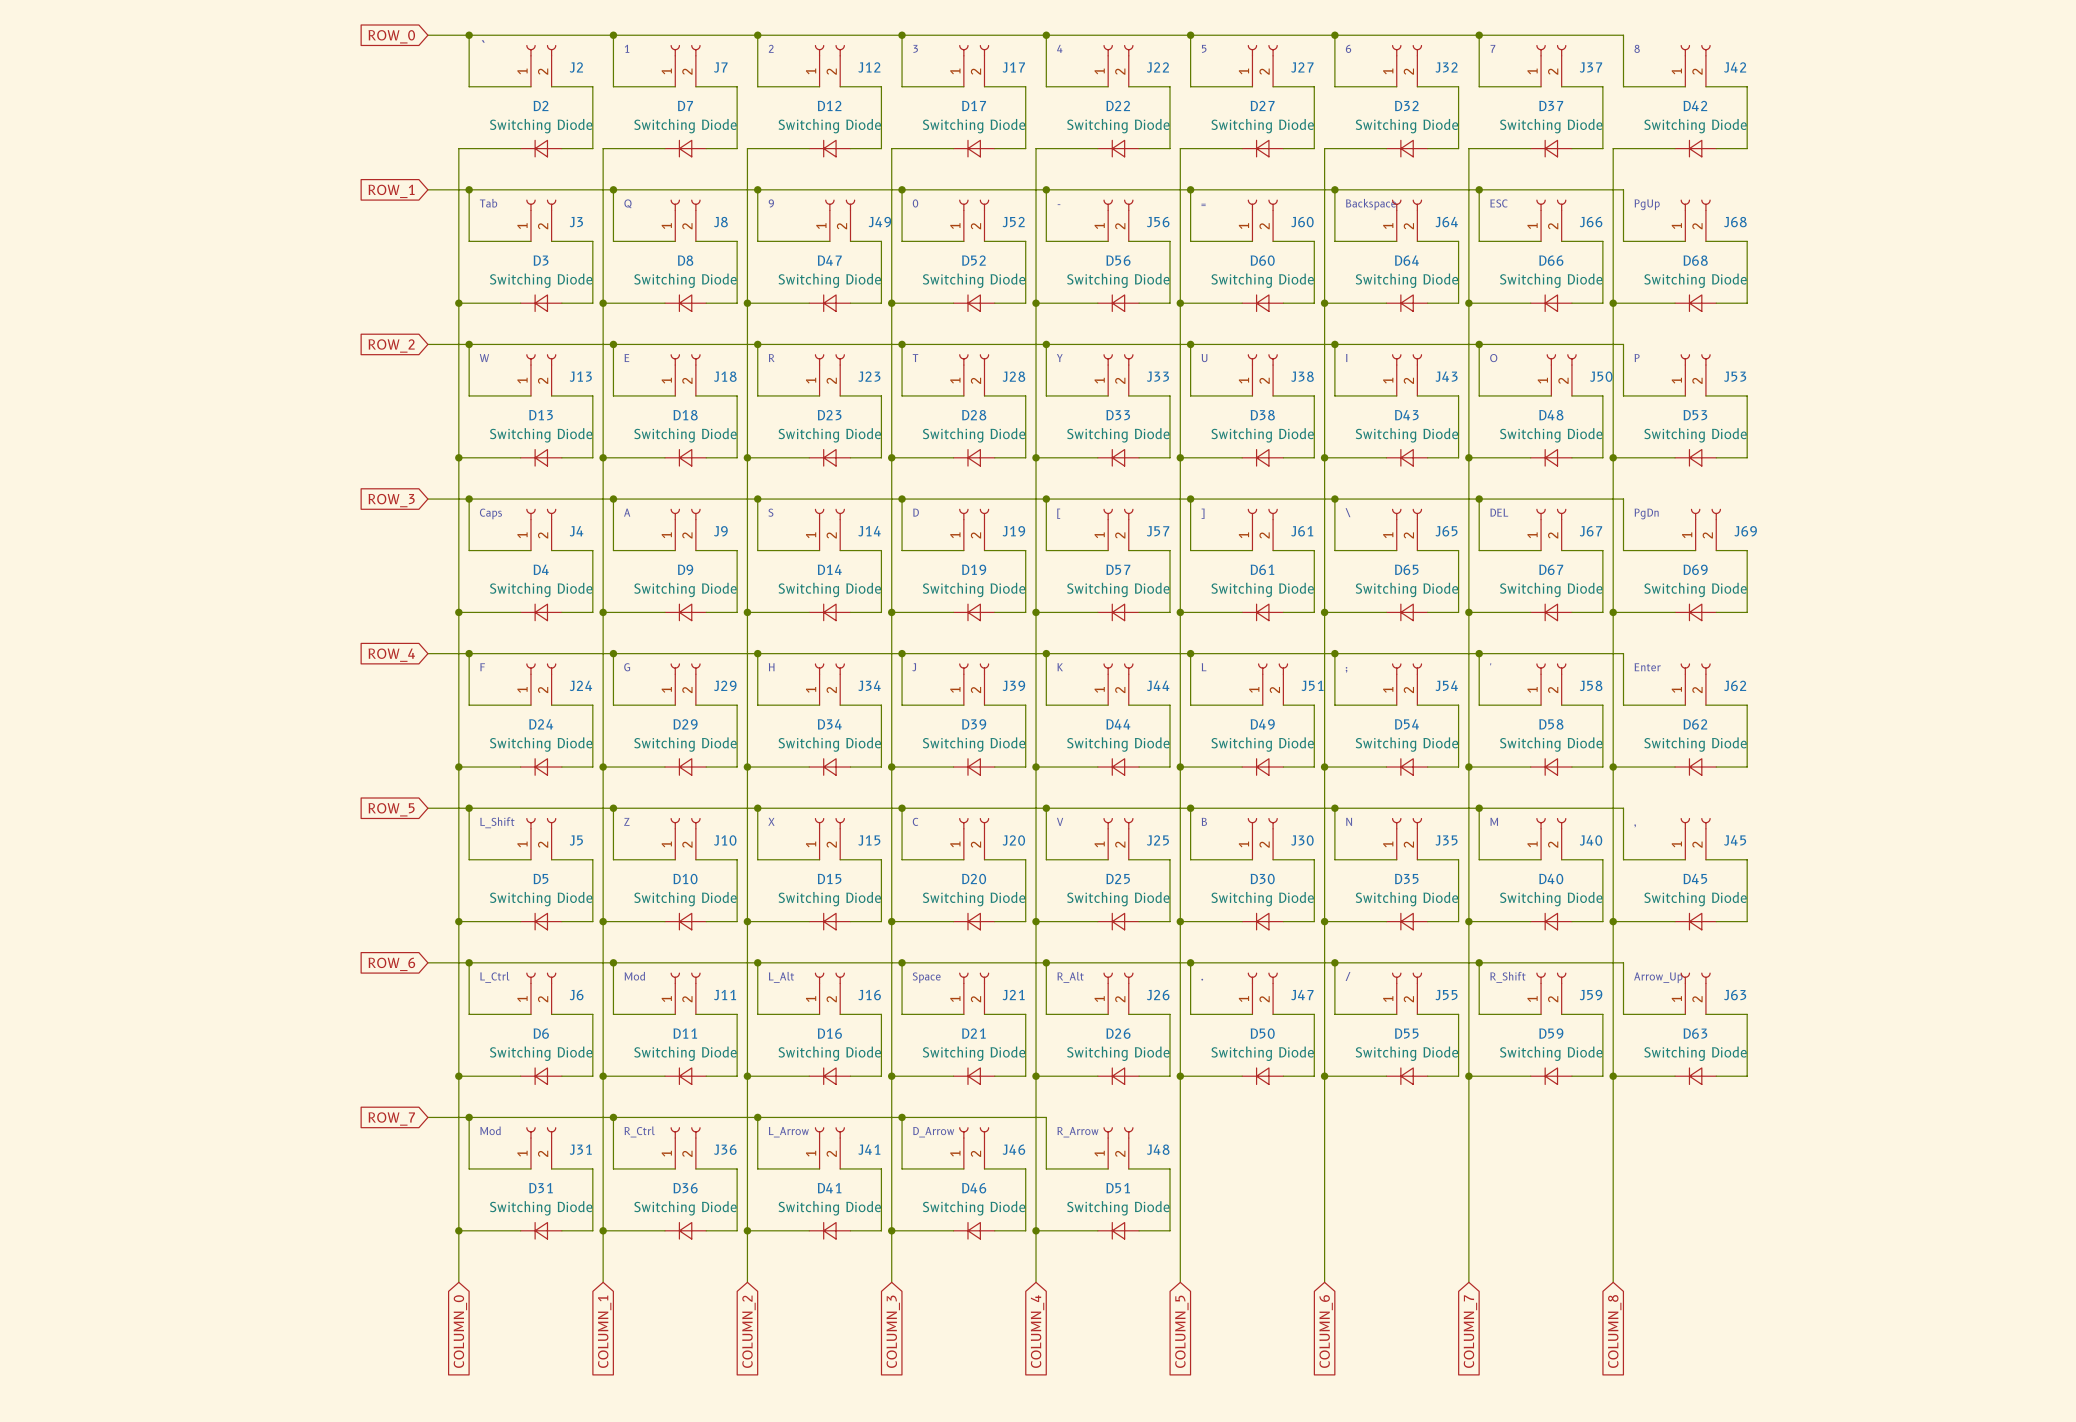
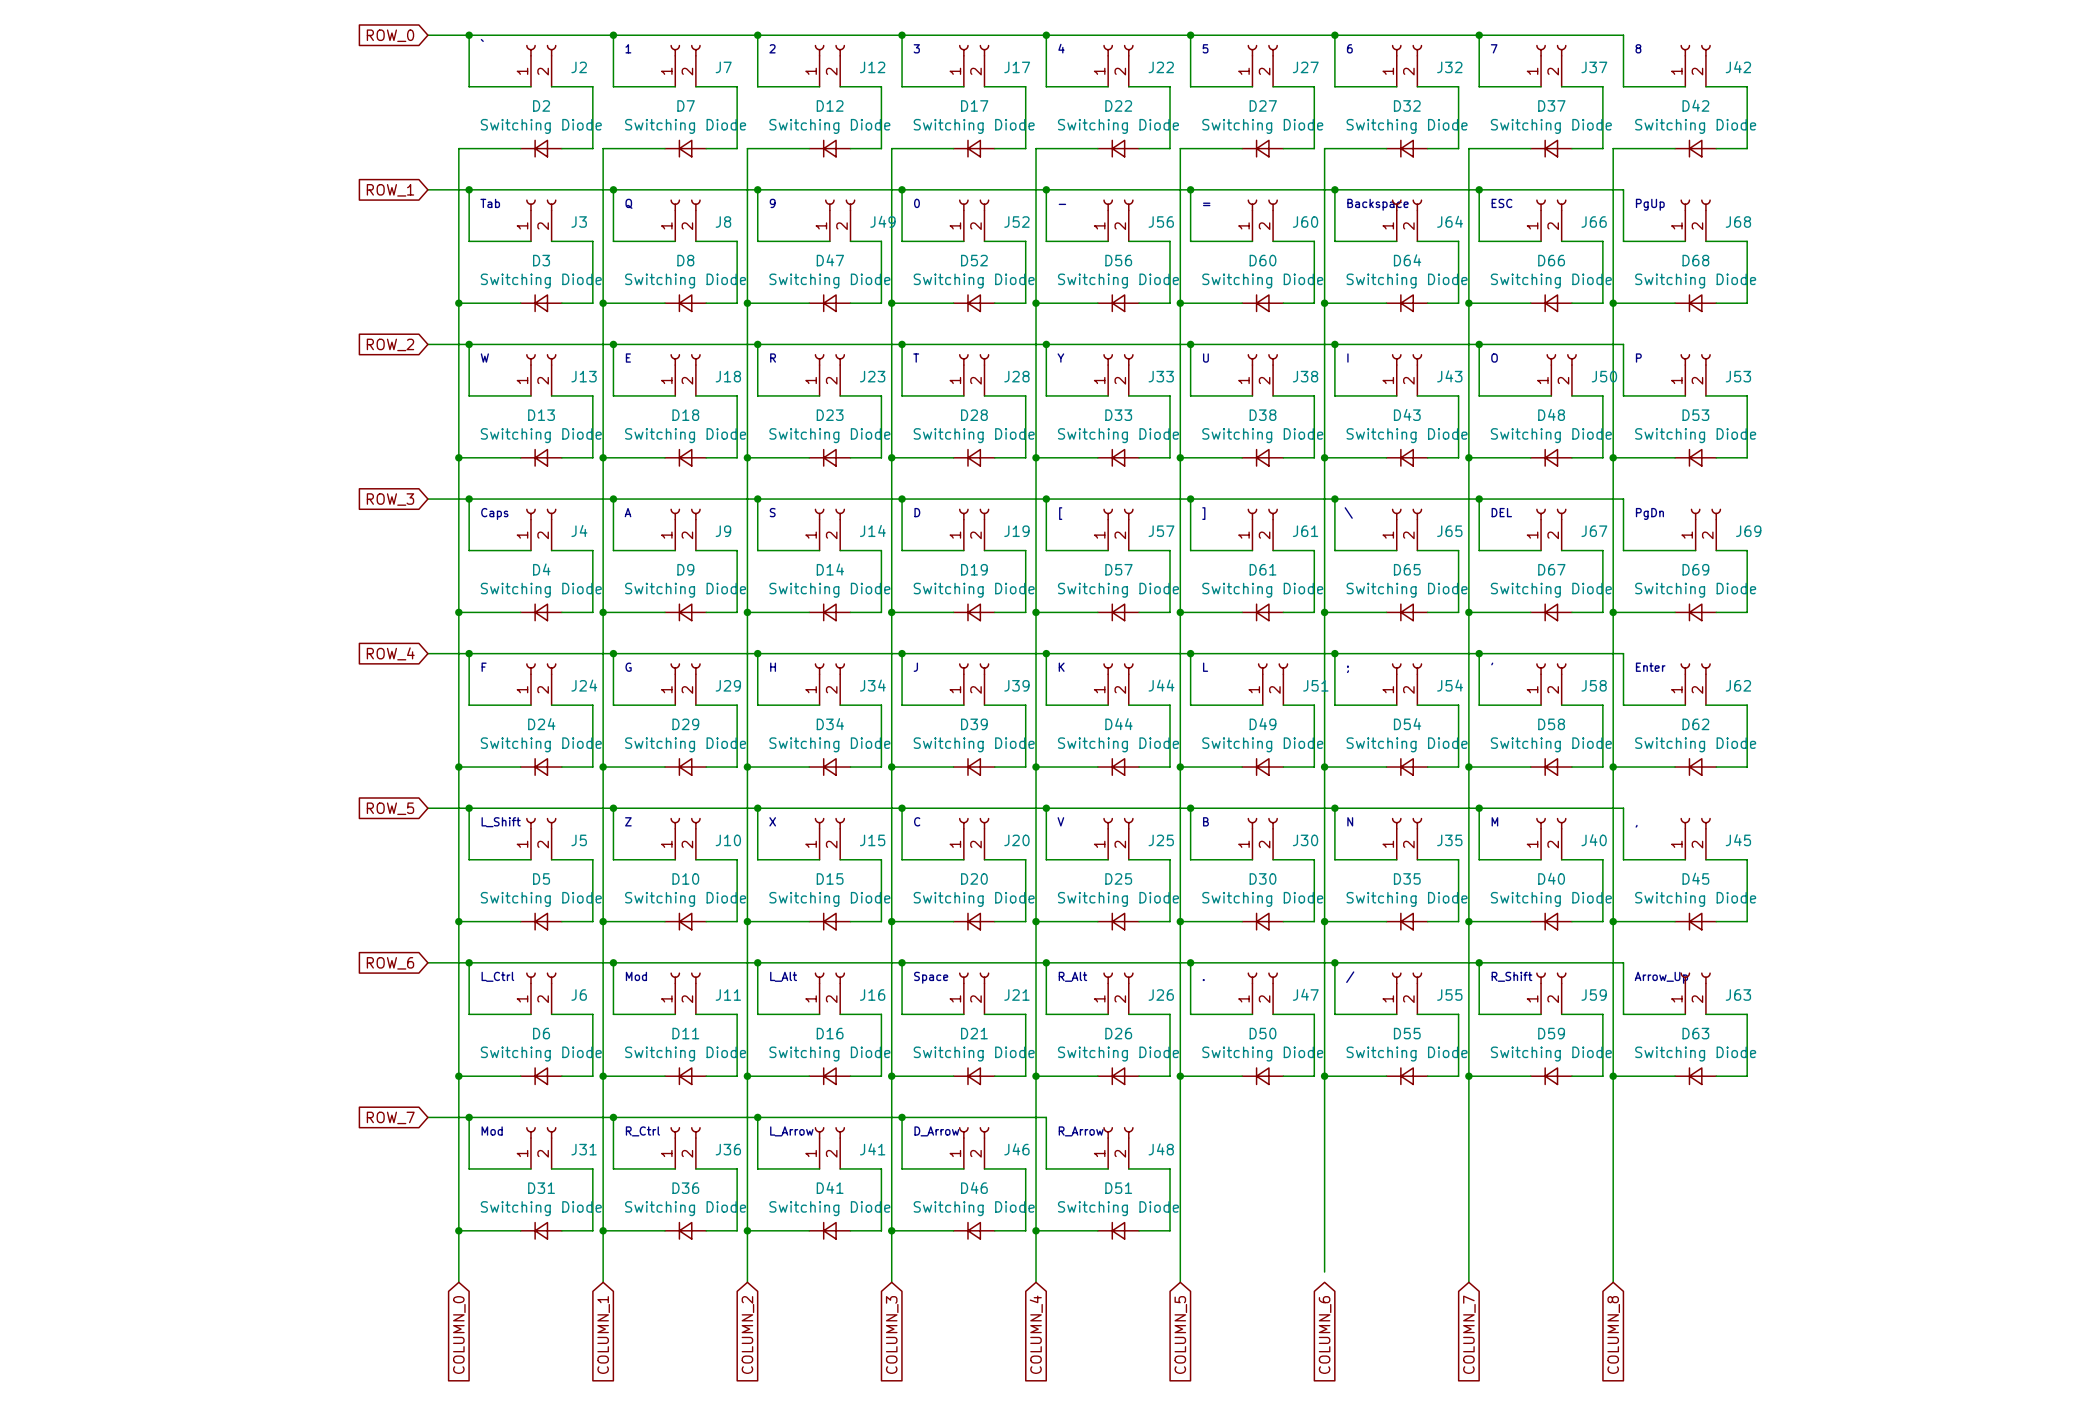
wire: (1324, 1272) (1324, 1282) -> none

